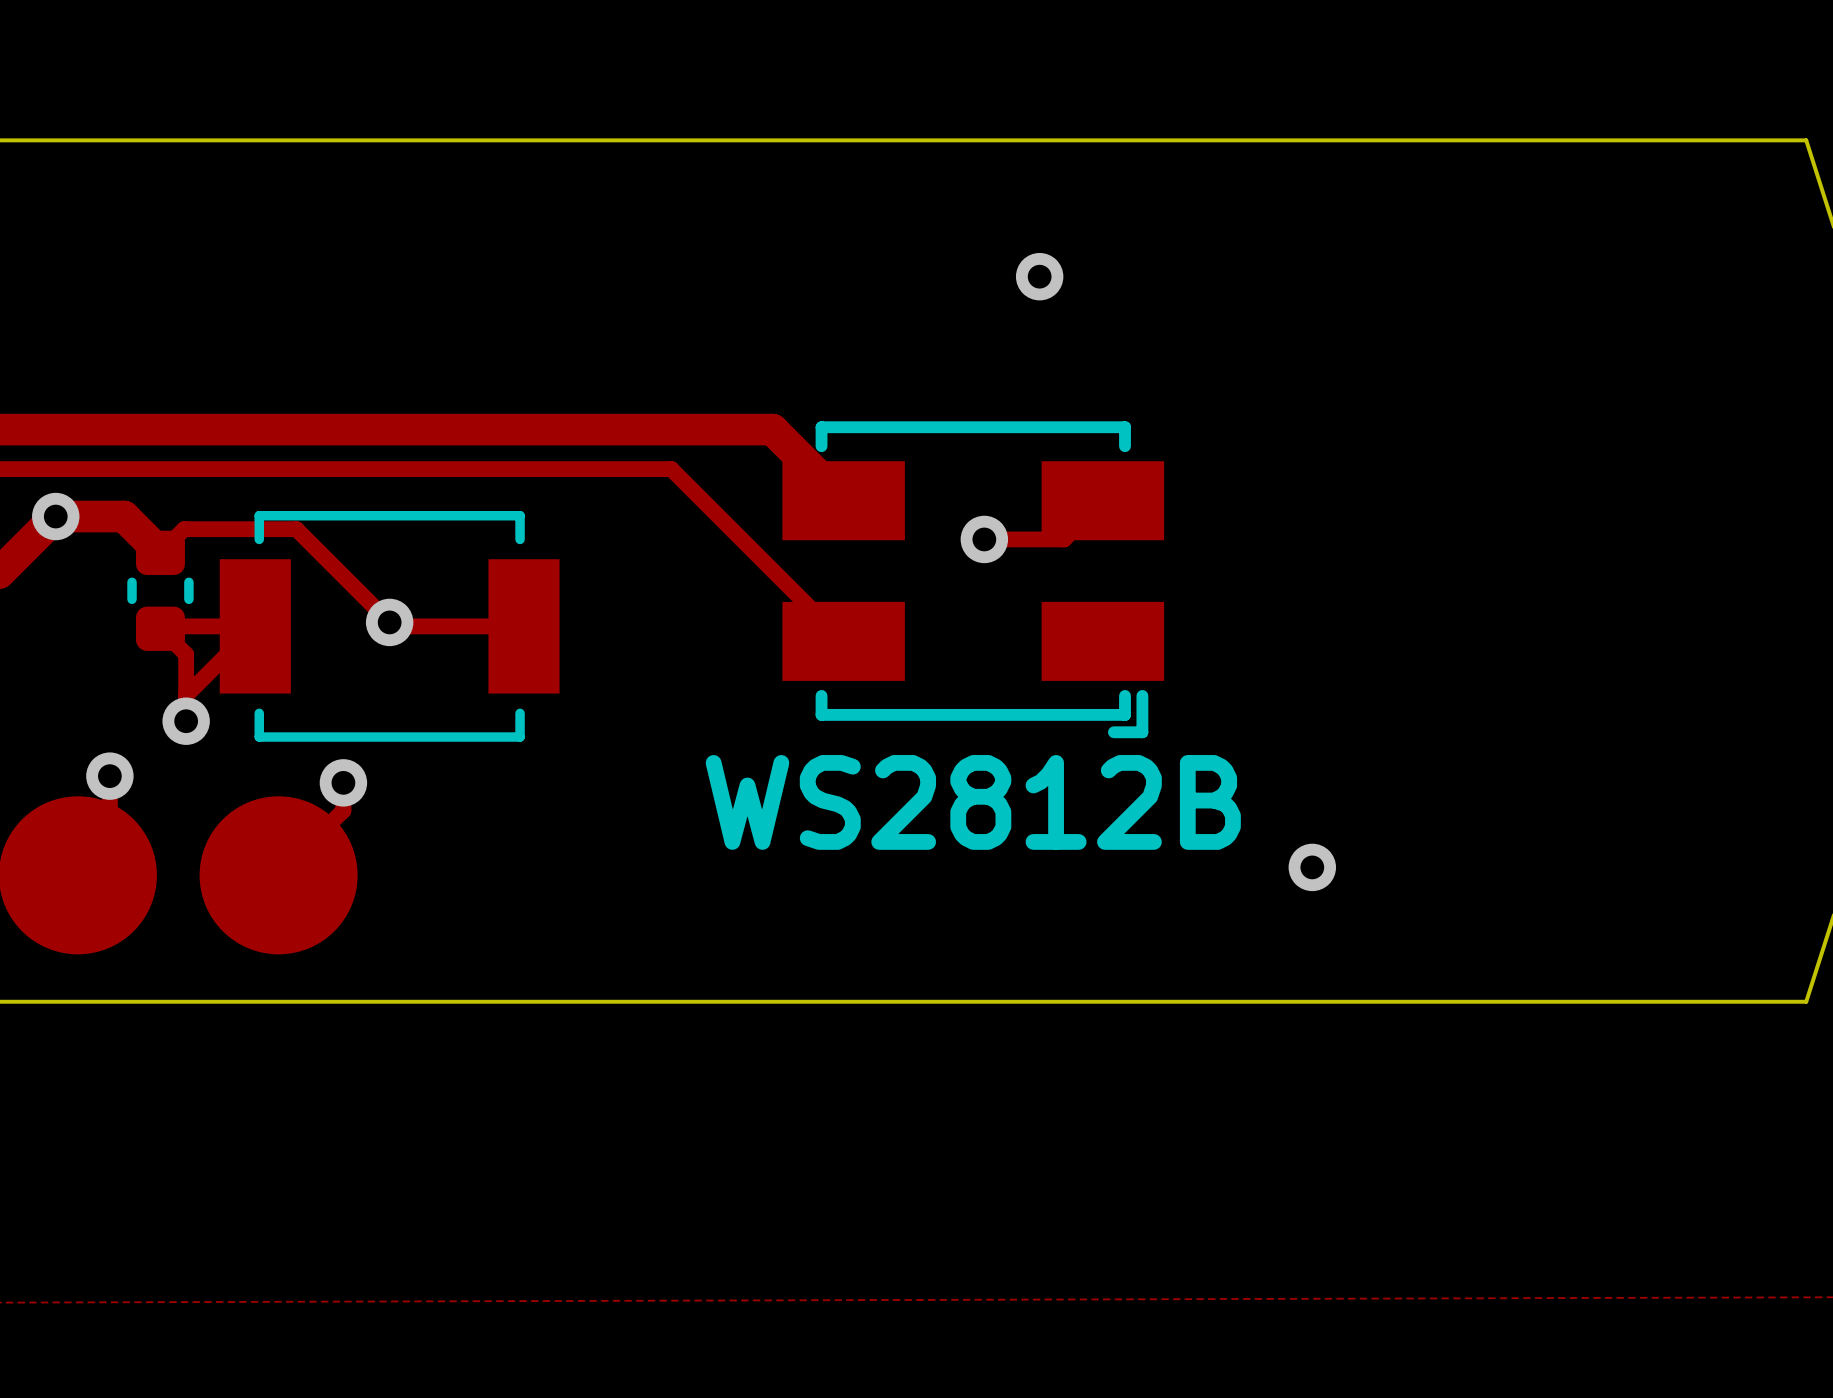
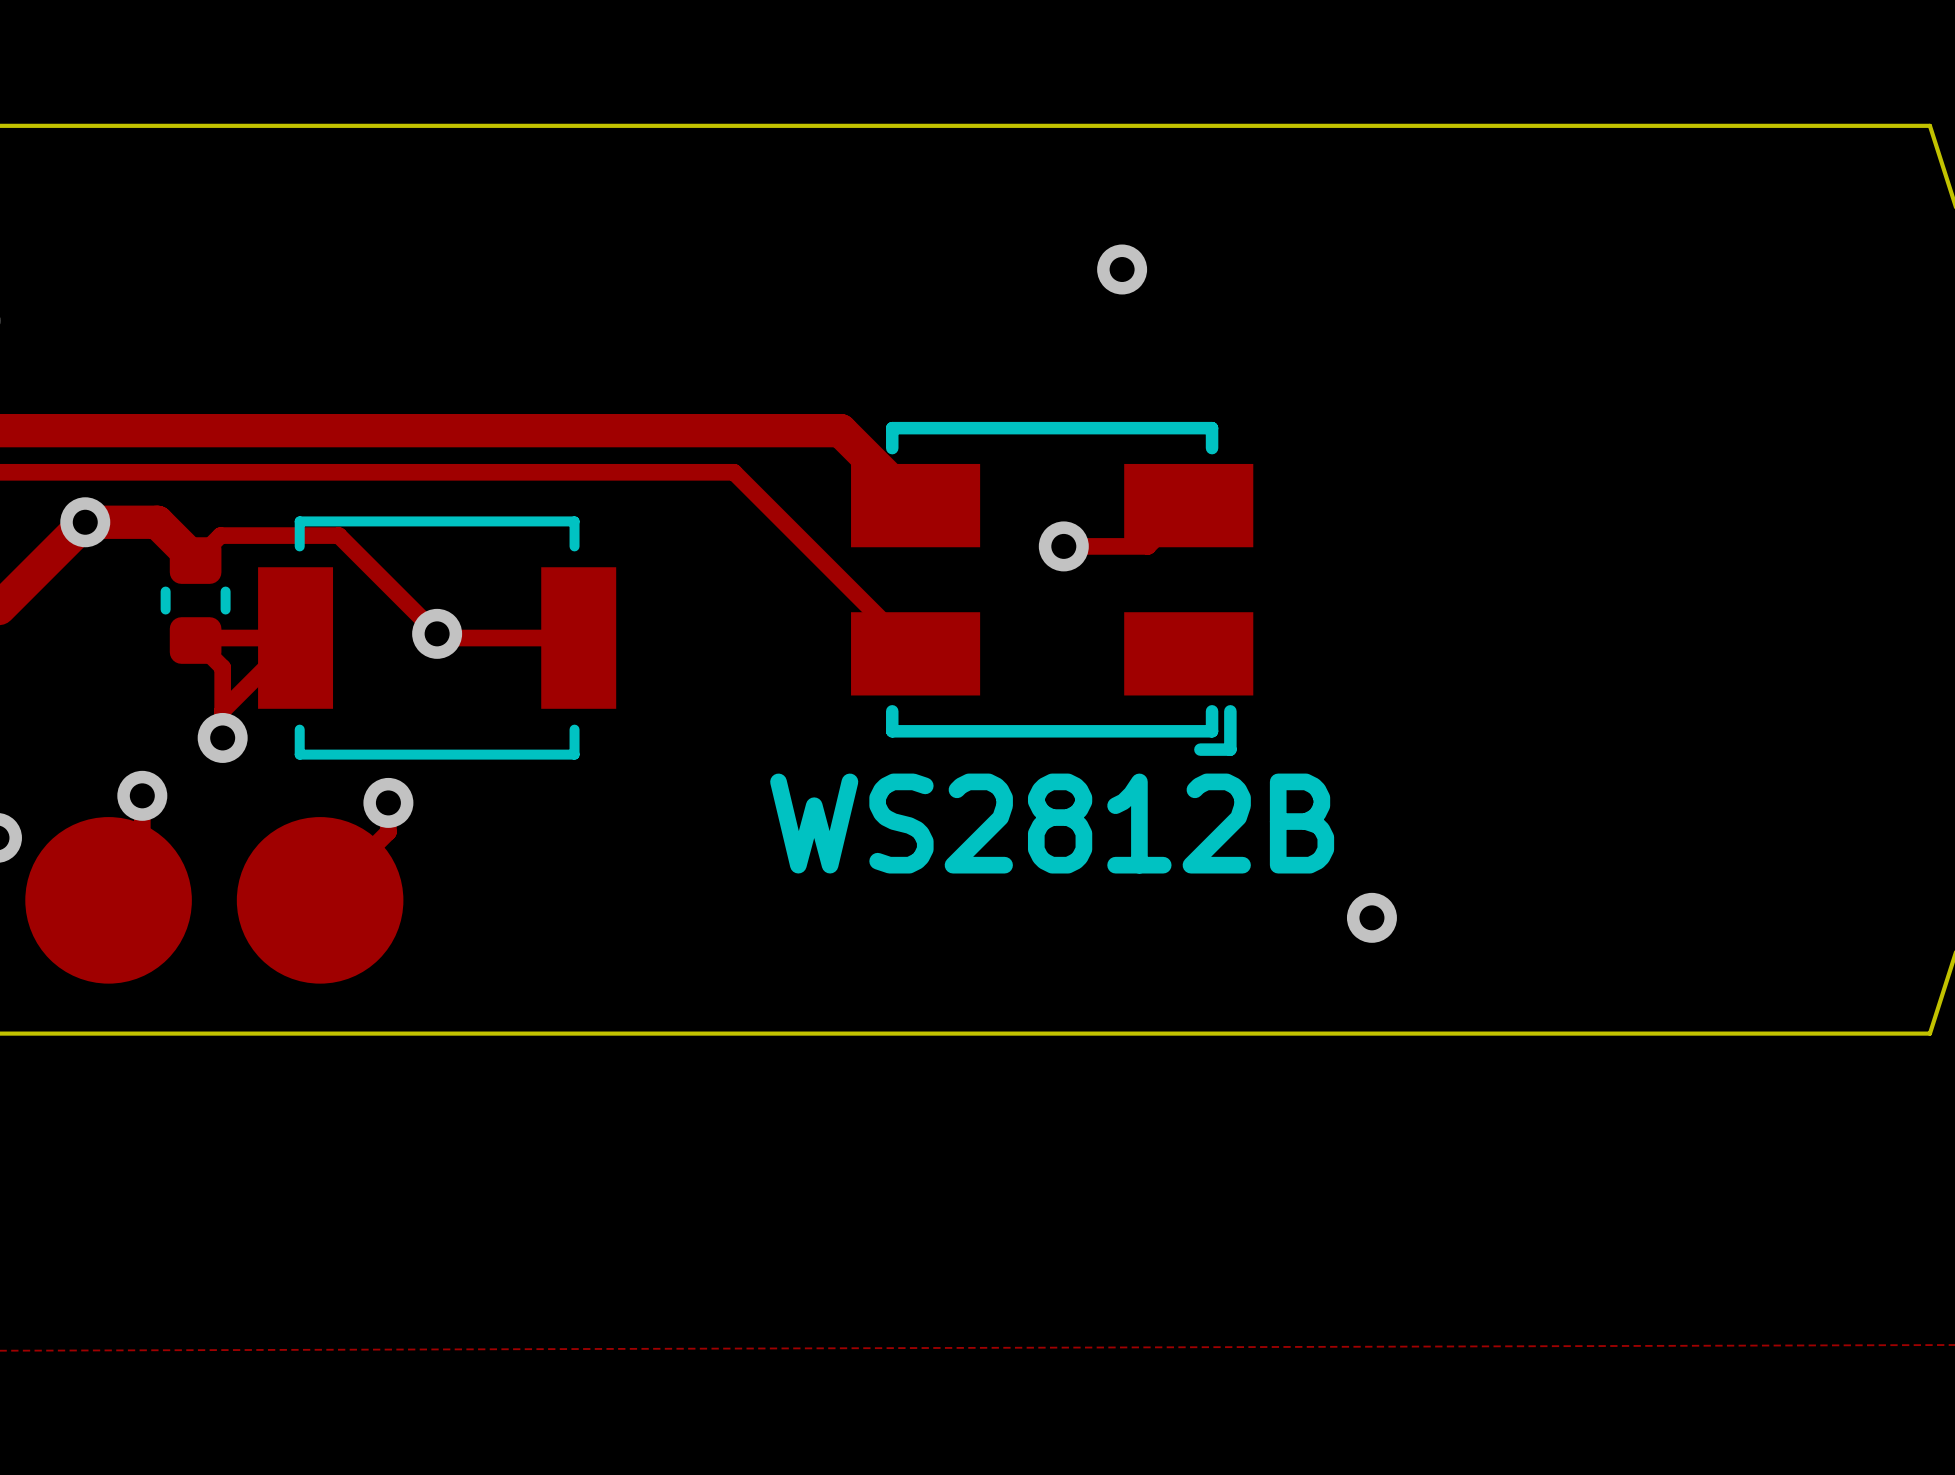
via position: (1312, 867) -> (1371, 917)

